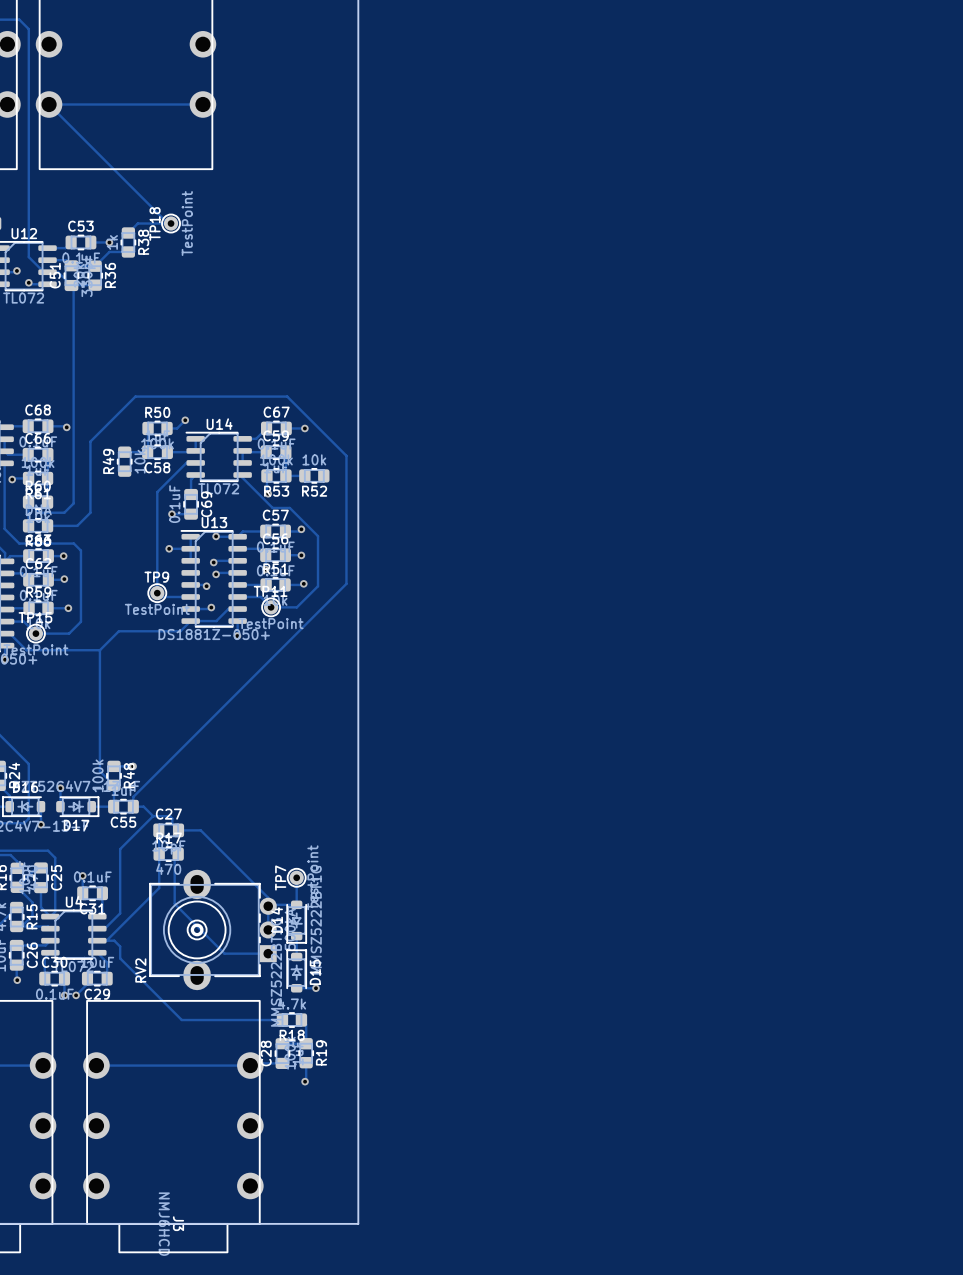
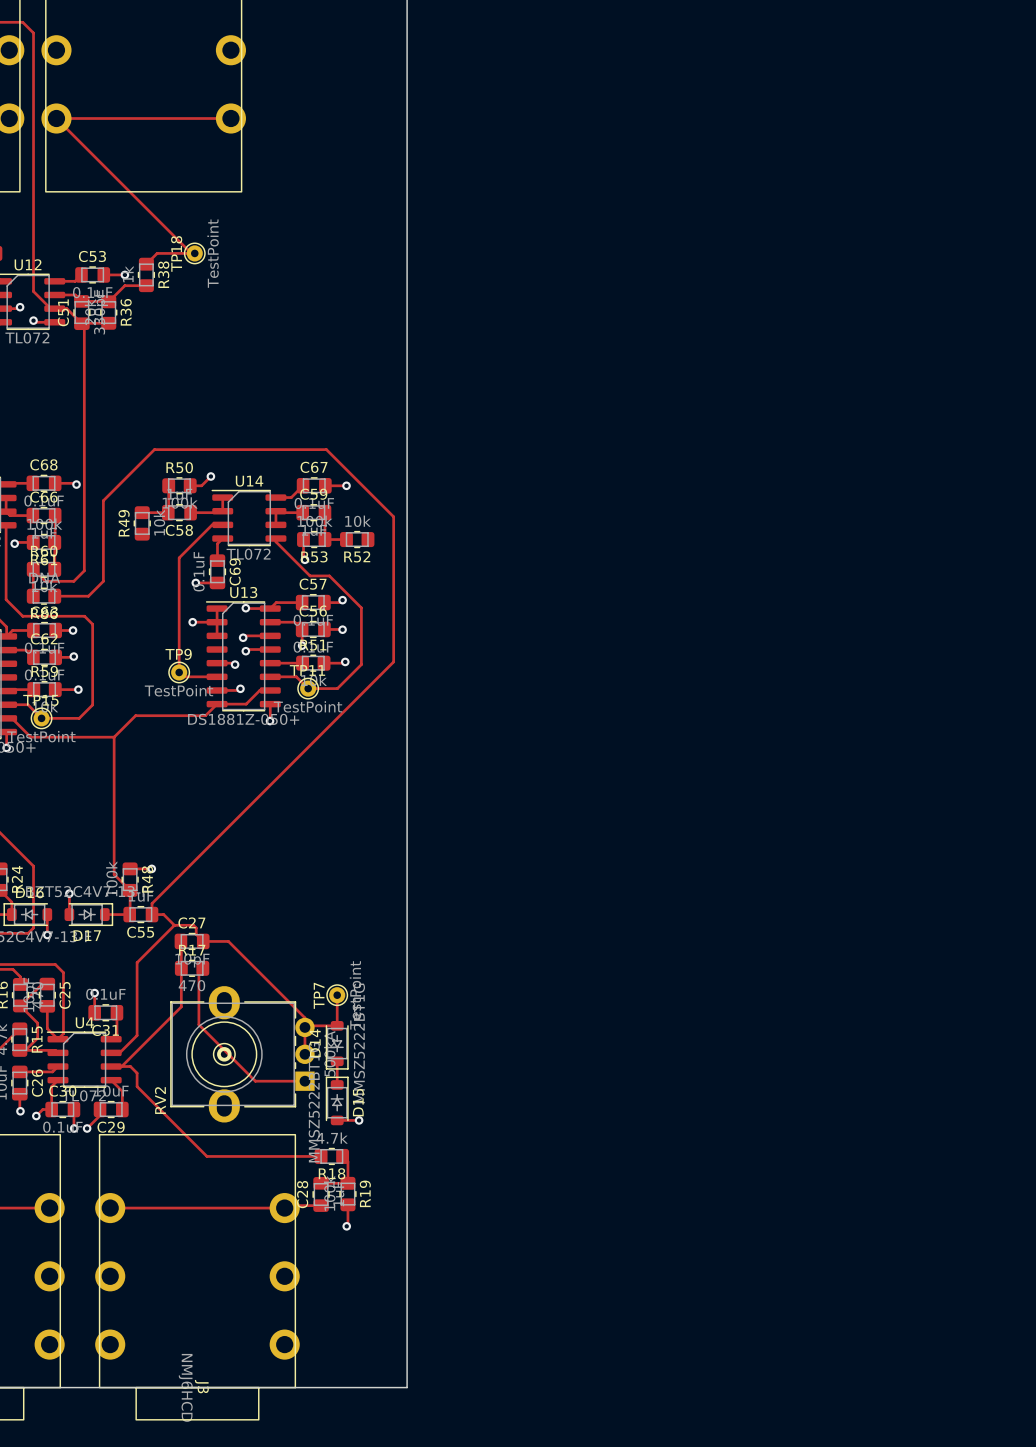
track: none -> (51, 1109) (42, 1109) (36, 1116)
via: none -> (36, 1116)

